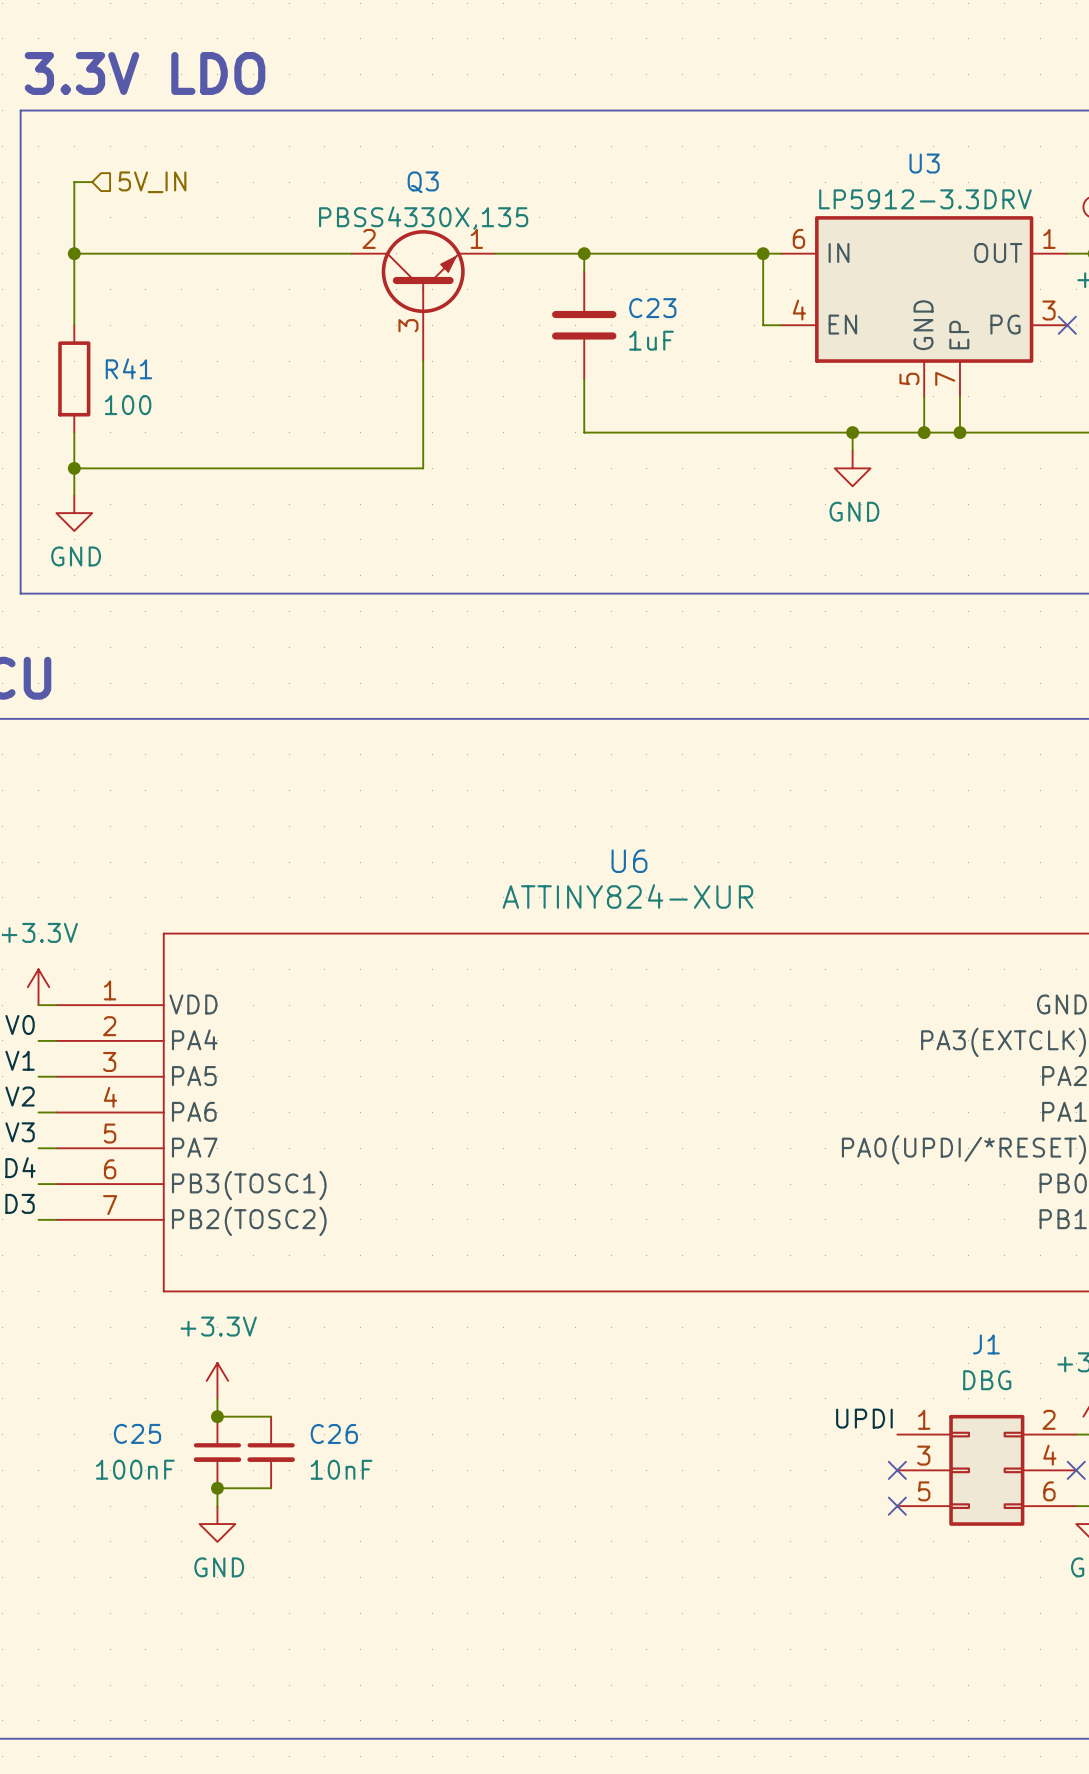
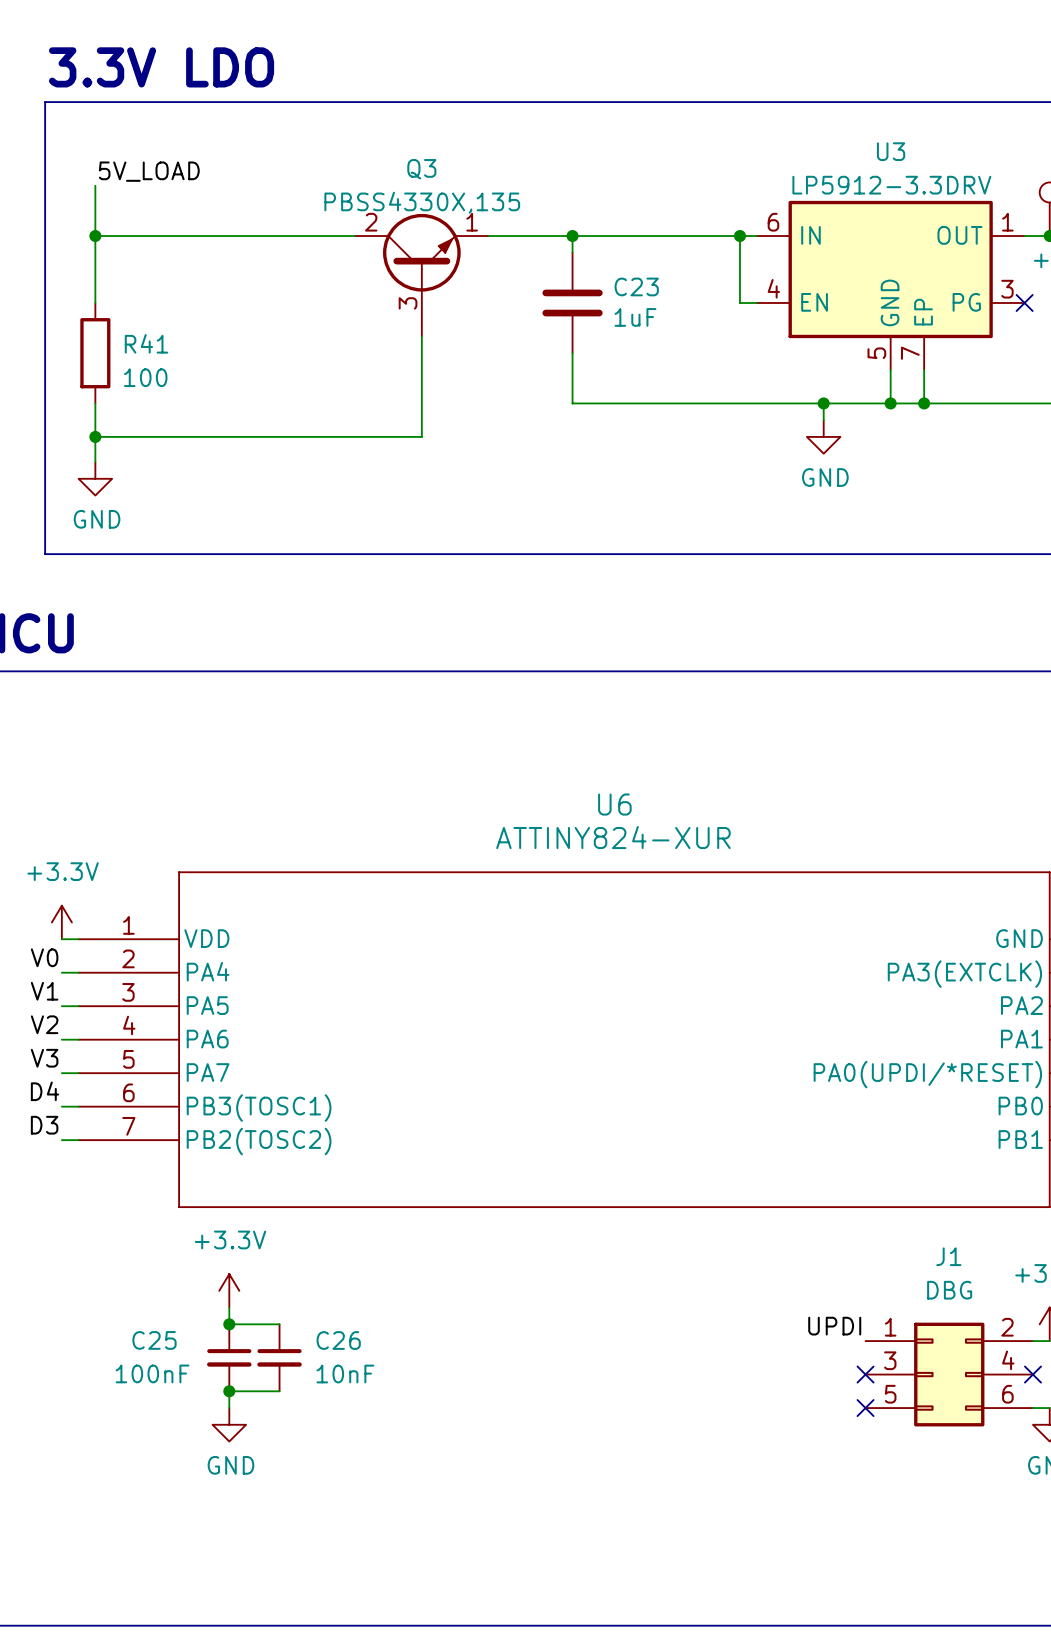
wire: (92, 182) (74, 182) (74, 200) -> none
hierarchical label: 5V_IN (152, 182) -> none
label: none -> 5V_LOAD (149, 171)

